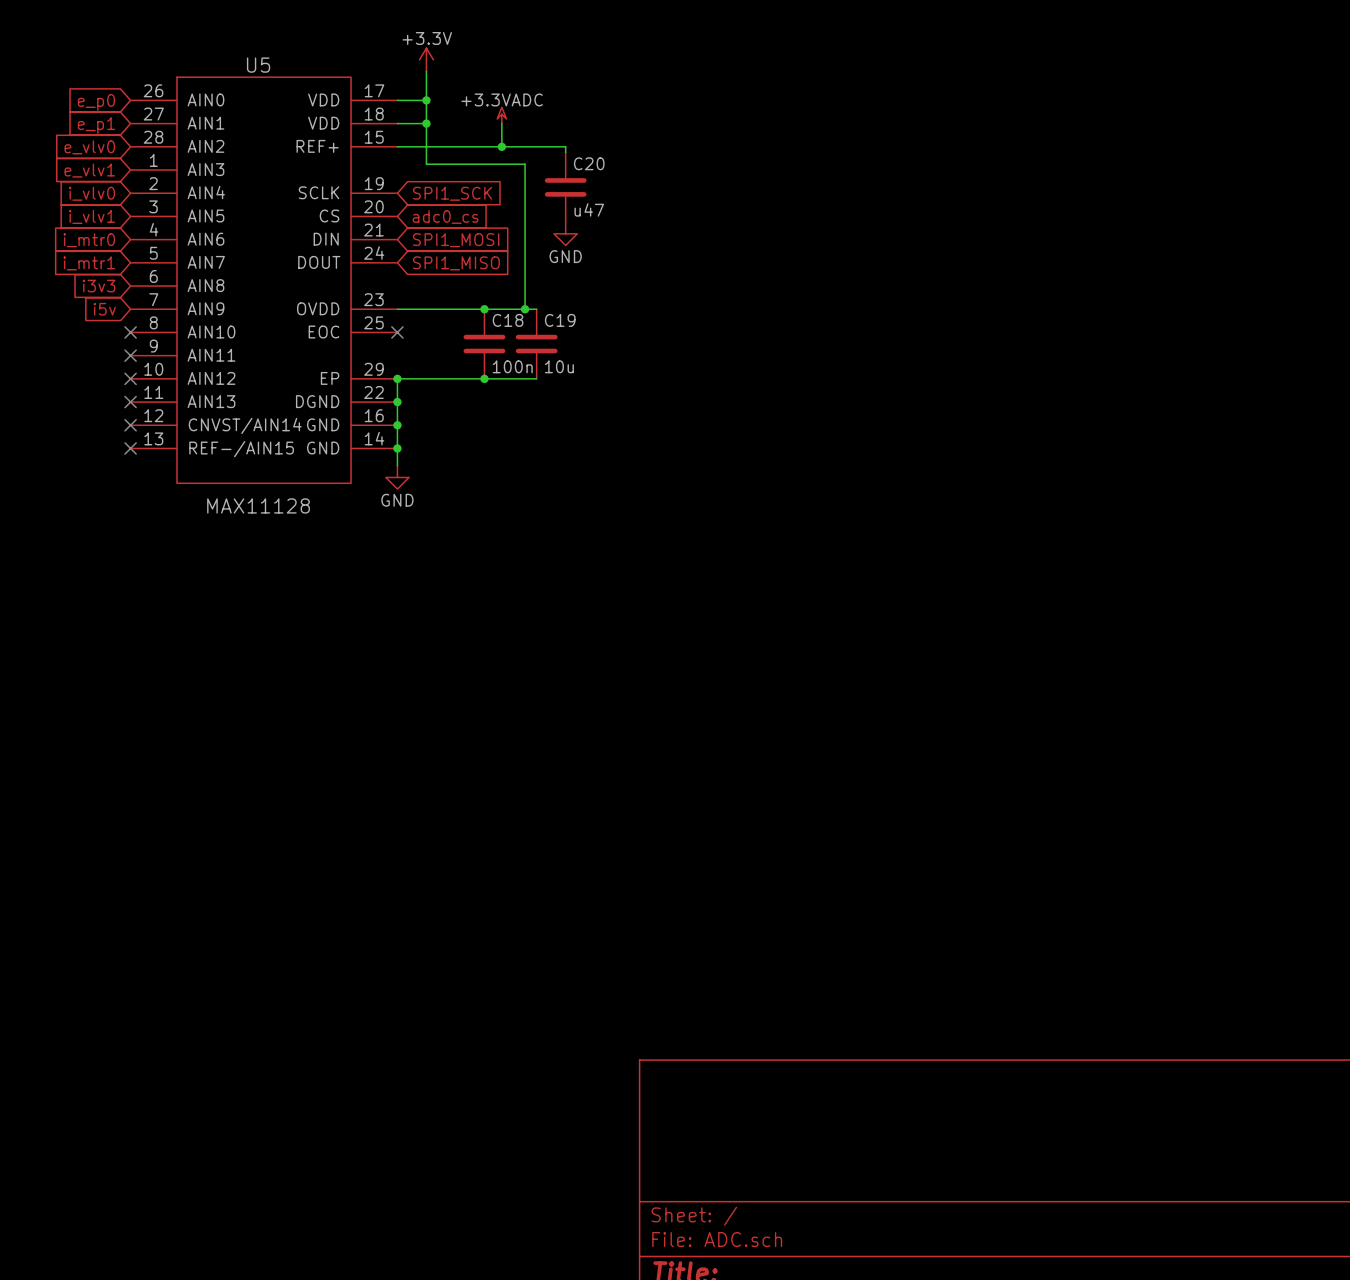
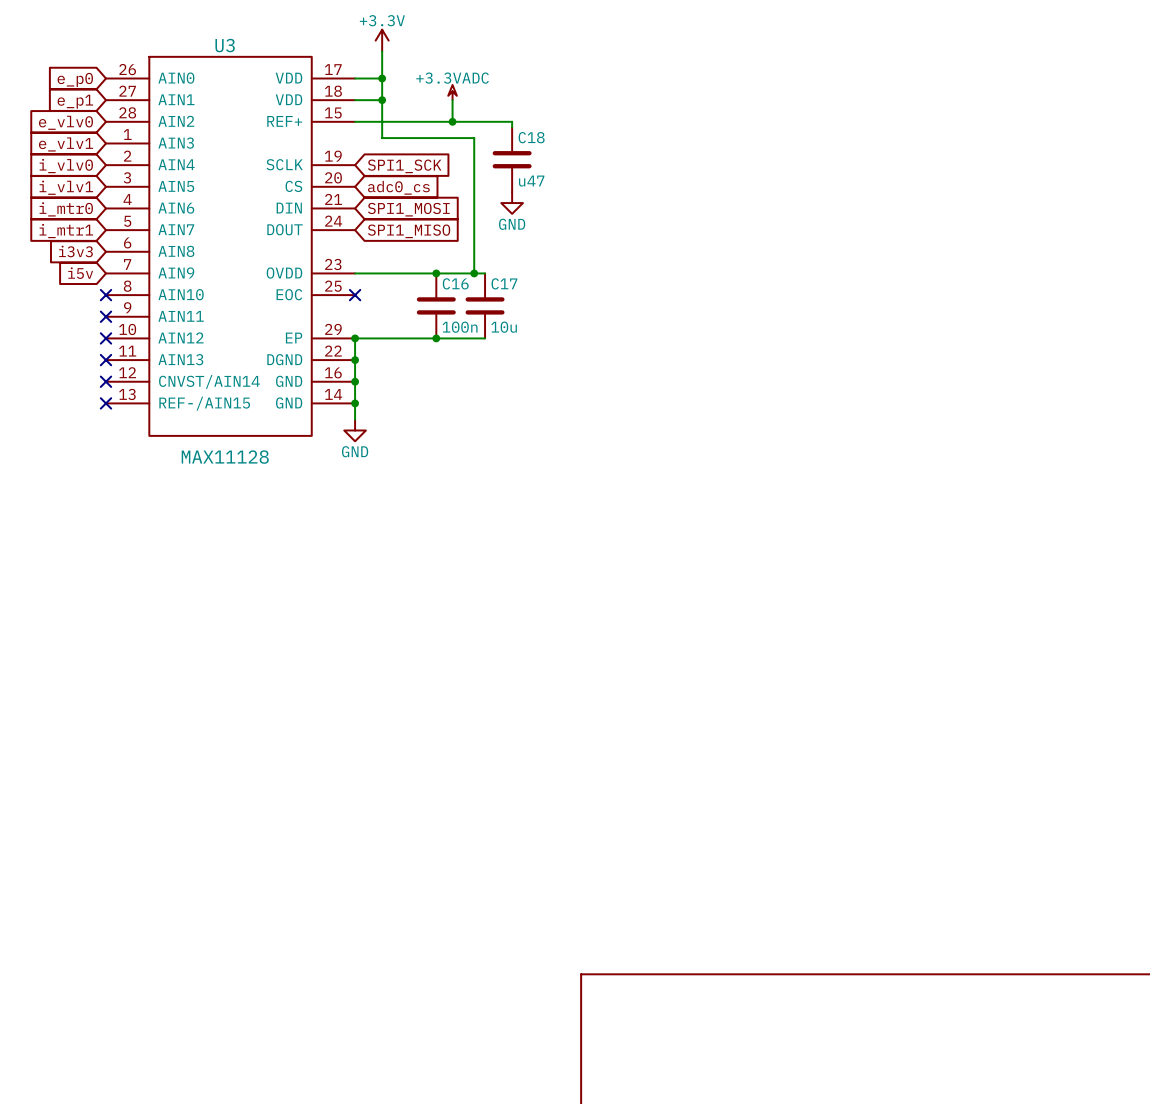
U5 name: U5 (258, 65) -> U3 (225, 45)
C20 name: C20 (589, 163) -> C18 (531, 137)
C18 name: C18 (508, 320) -> C16 (455, 283)
C19 name: C19 (560, 320) -> C17 (504, 283)

